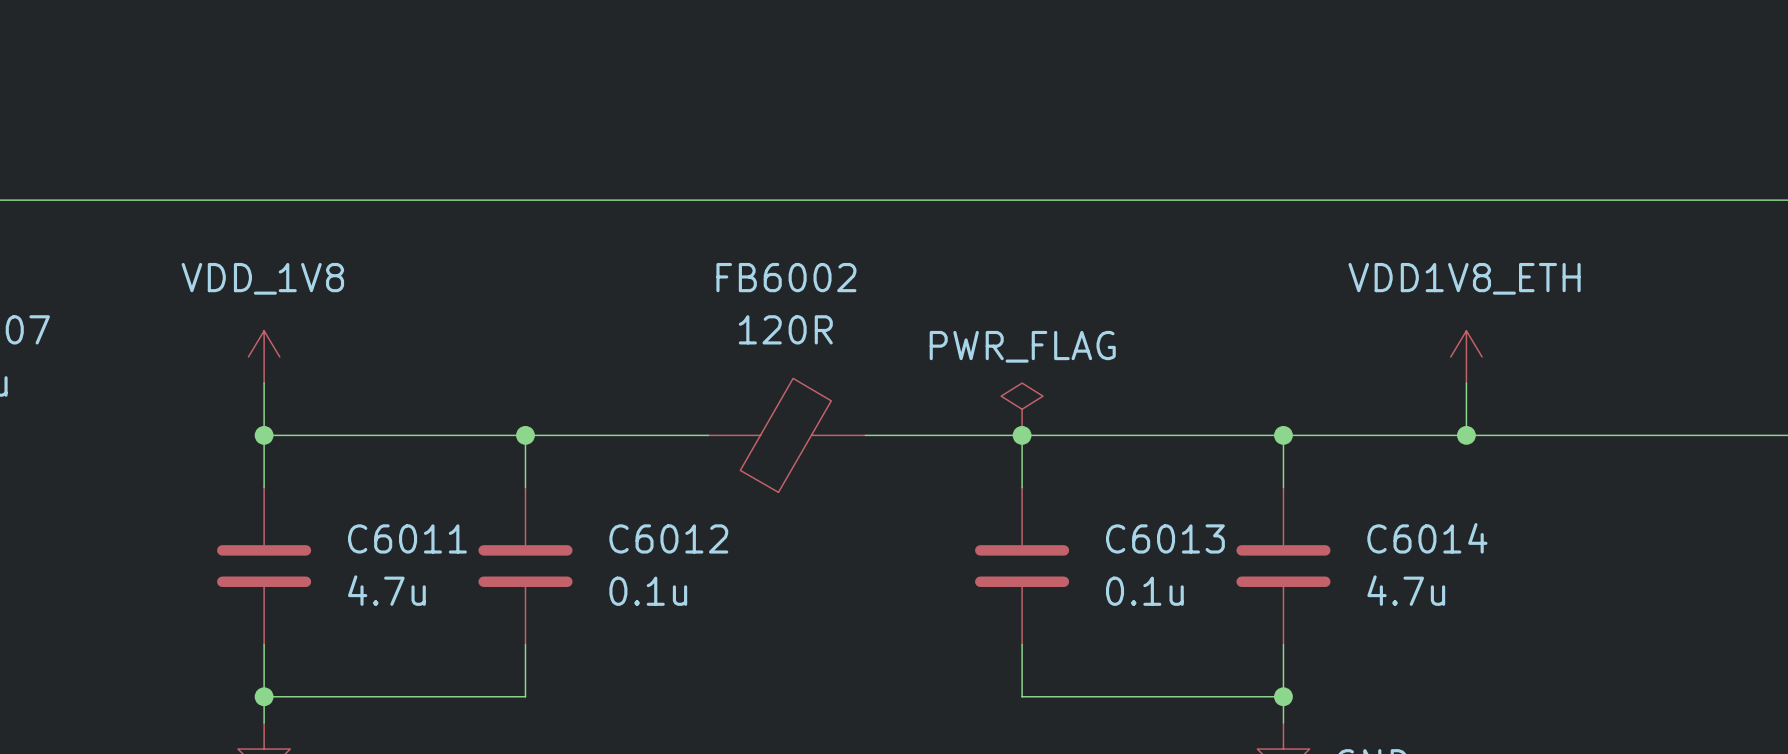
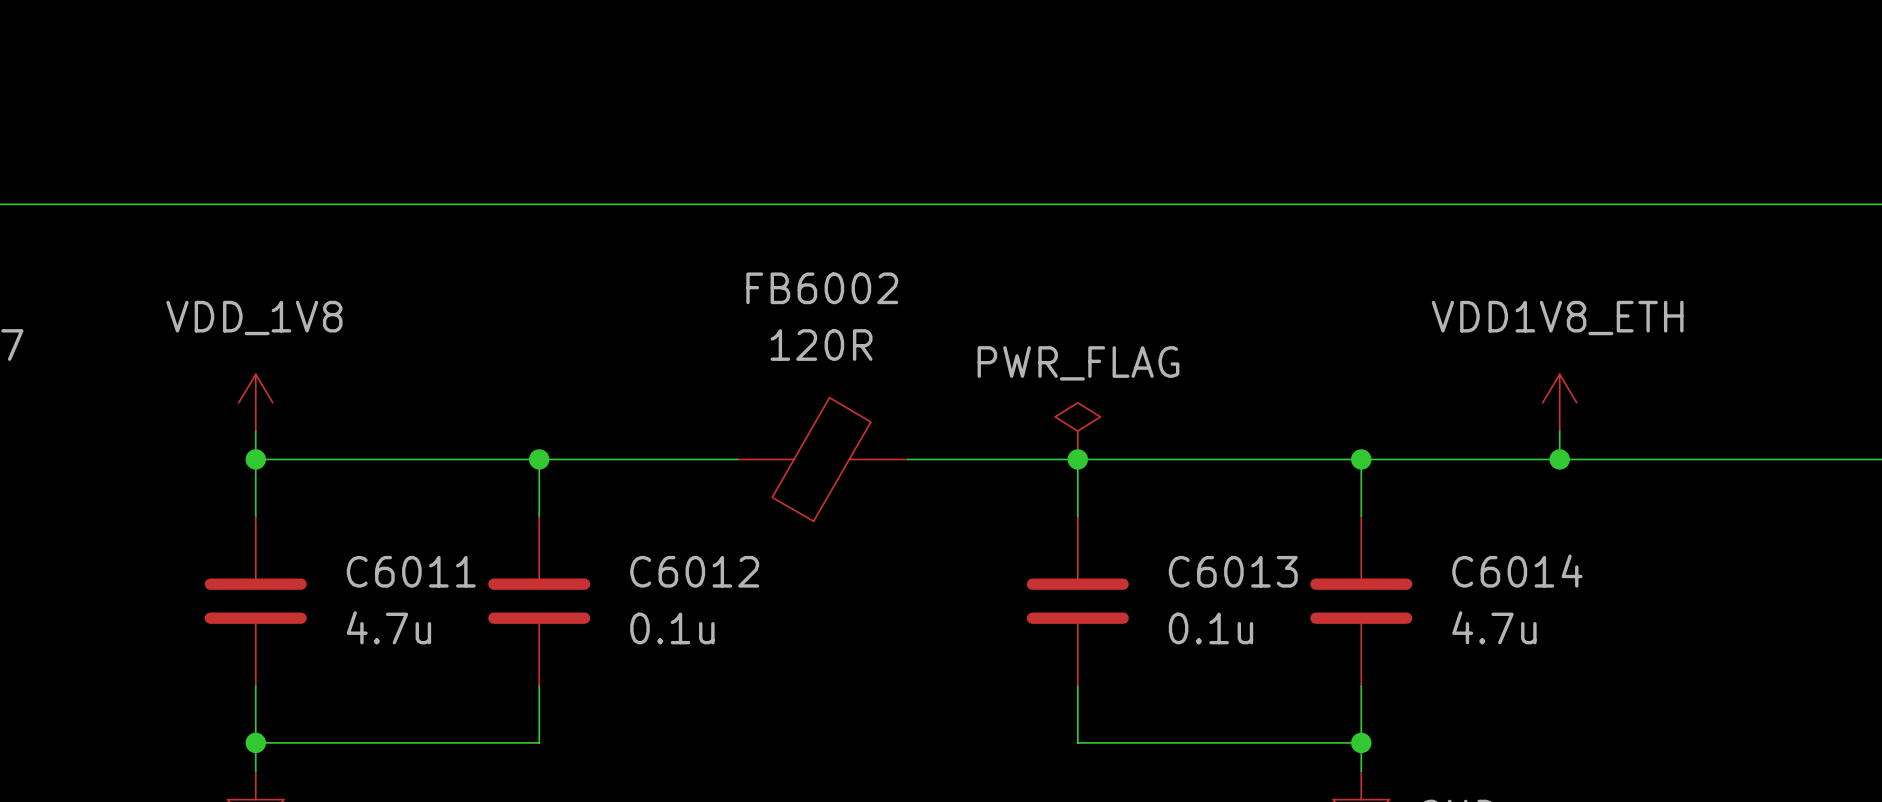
power symbol position: VDD_1V8 (264, 356) -> VDD_1V8 (255, 402)
power symbol position: VDD1V8_ETH (1466, 356) -> VDD1V8_ETH (1559, 402)

